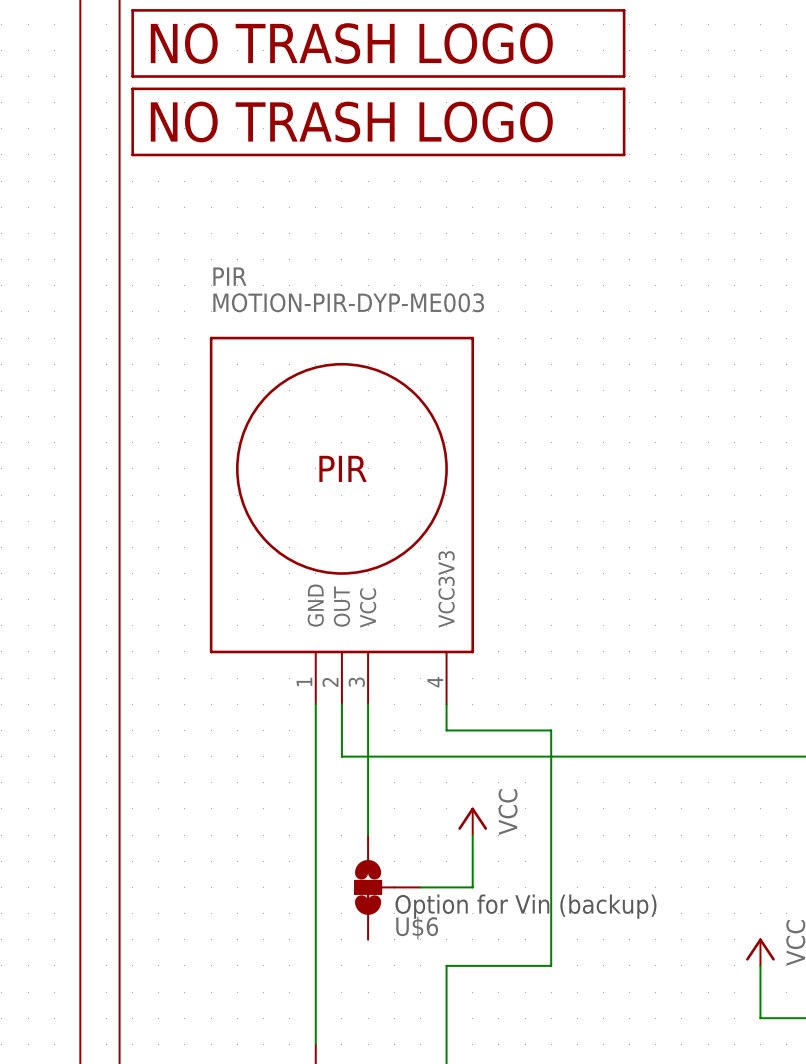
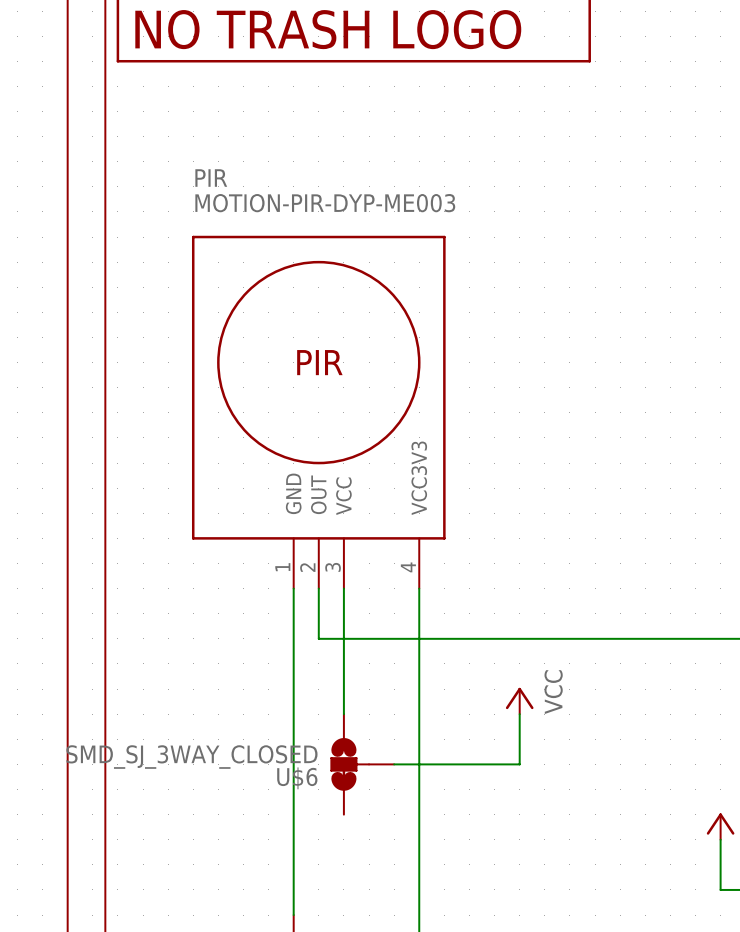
wire: (446, 730) (551, 730) (551, 835) -> (419, 613) (419, 839)
power symbol position: VCC (472, 821) -> VCC (519, 700)
wire: (472, 835) (472, 887) -> none
U$6 value: none -> SMD_SJ_3WAY_CLOSED (191, 757)
wire: (551, 887) (551, 965) (446, 965) -> (519, 764) (444, 764)
text: Option for Vin (backup) (525, 906) -> none
U$6 name position: U$6 (417, 928) -> U$6 (297, 778)

